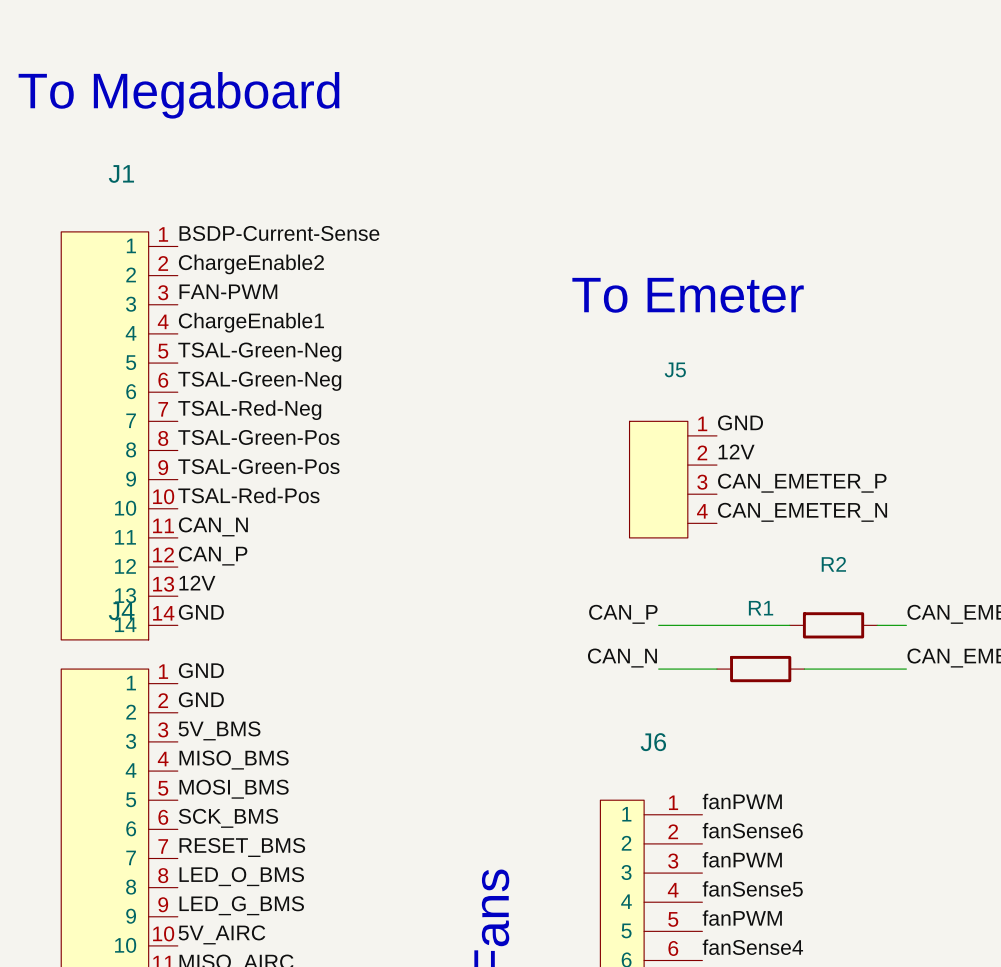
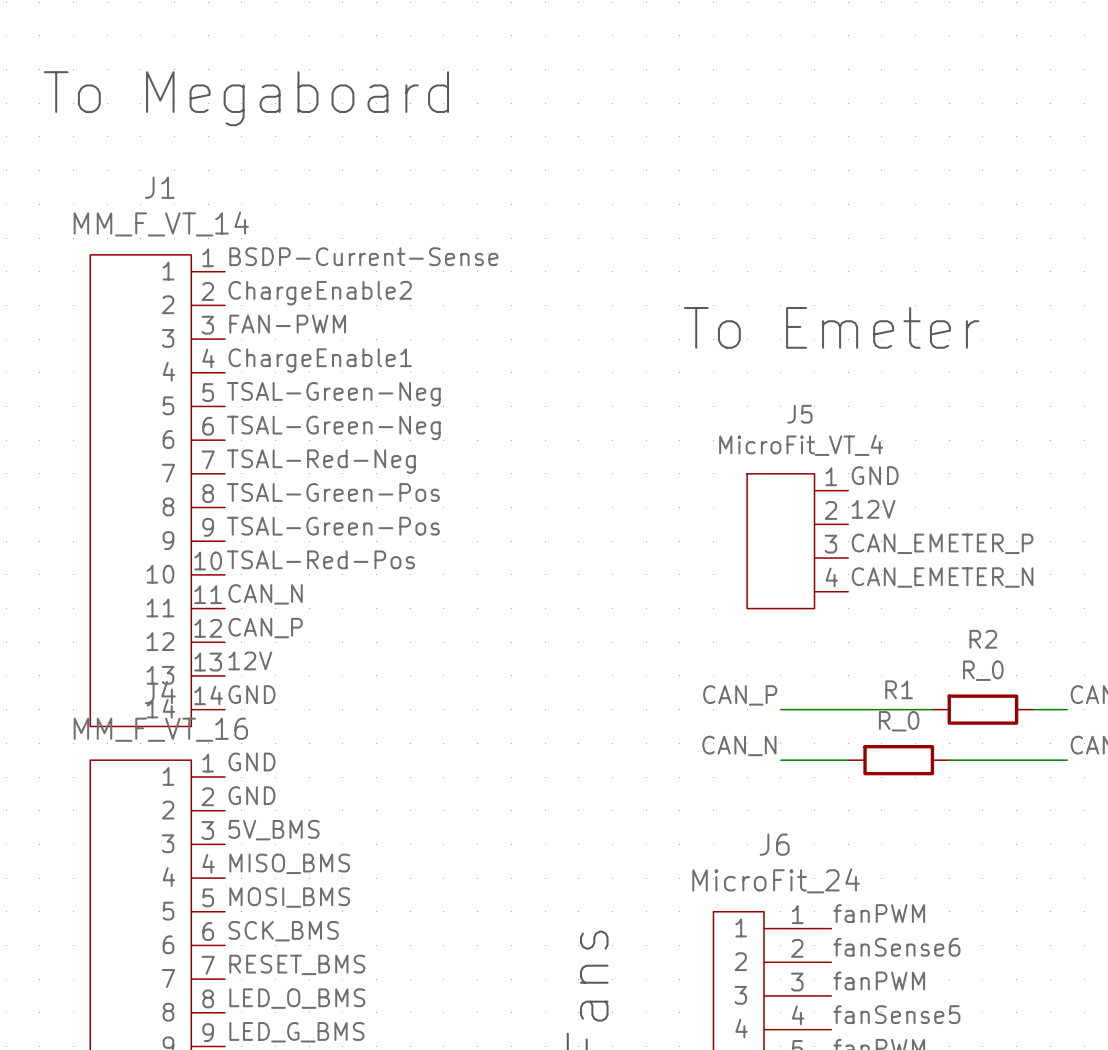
J1 value: none -> MM_F_VT_14 (161, 223)
J5 value: none -> MicroFit_VT_4 (801, 445)
R2 value: none -> R_0 (983, 670)
R1 value: none -> R_0 (899, 721)
J4 value: none -> MM_F_VT_16 (160, 729)
J6 value: none -> MicroFit_24 (776, 880)

